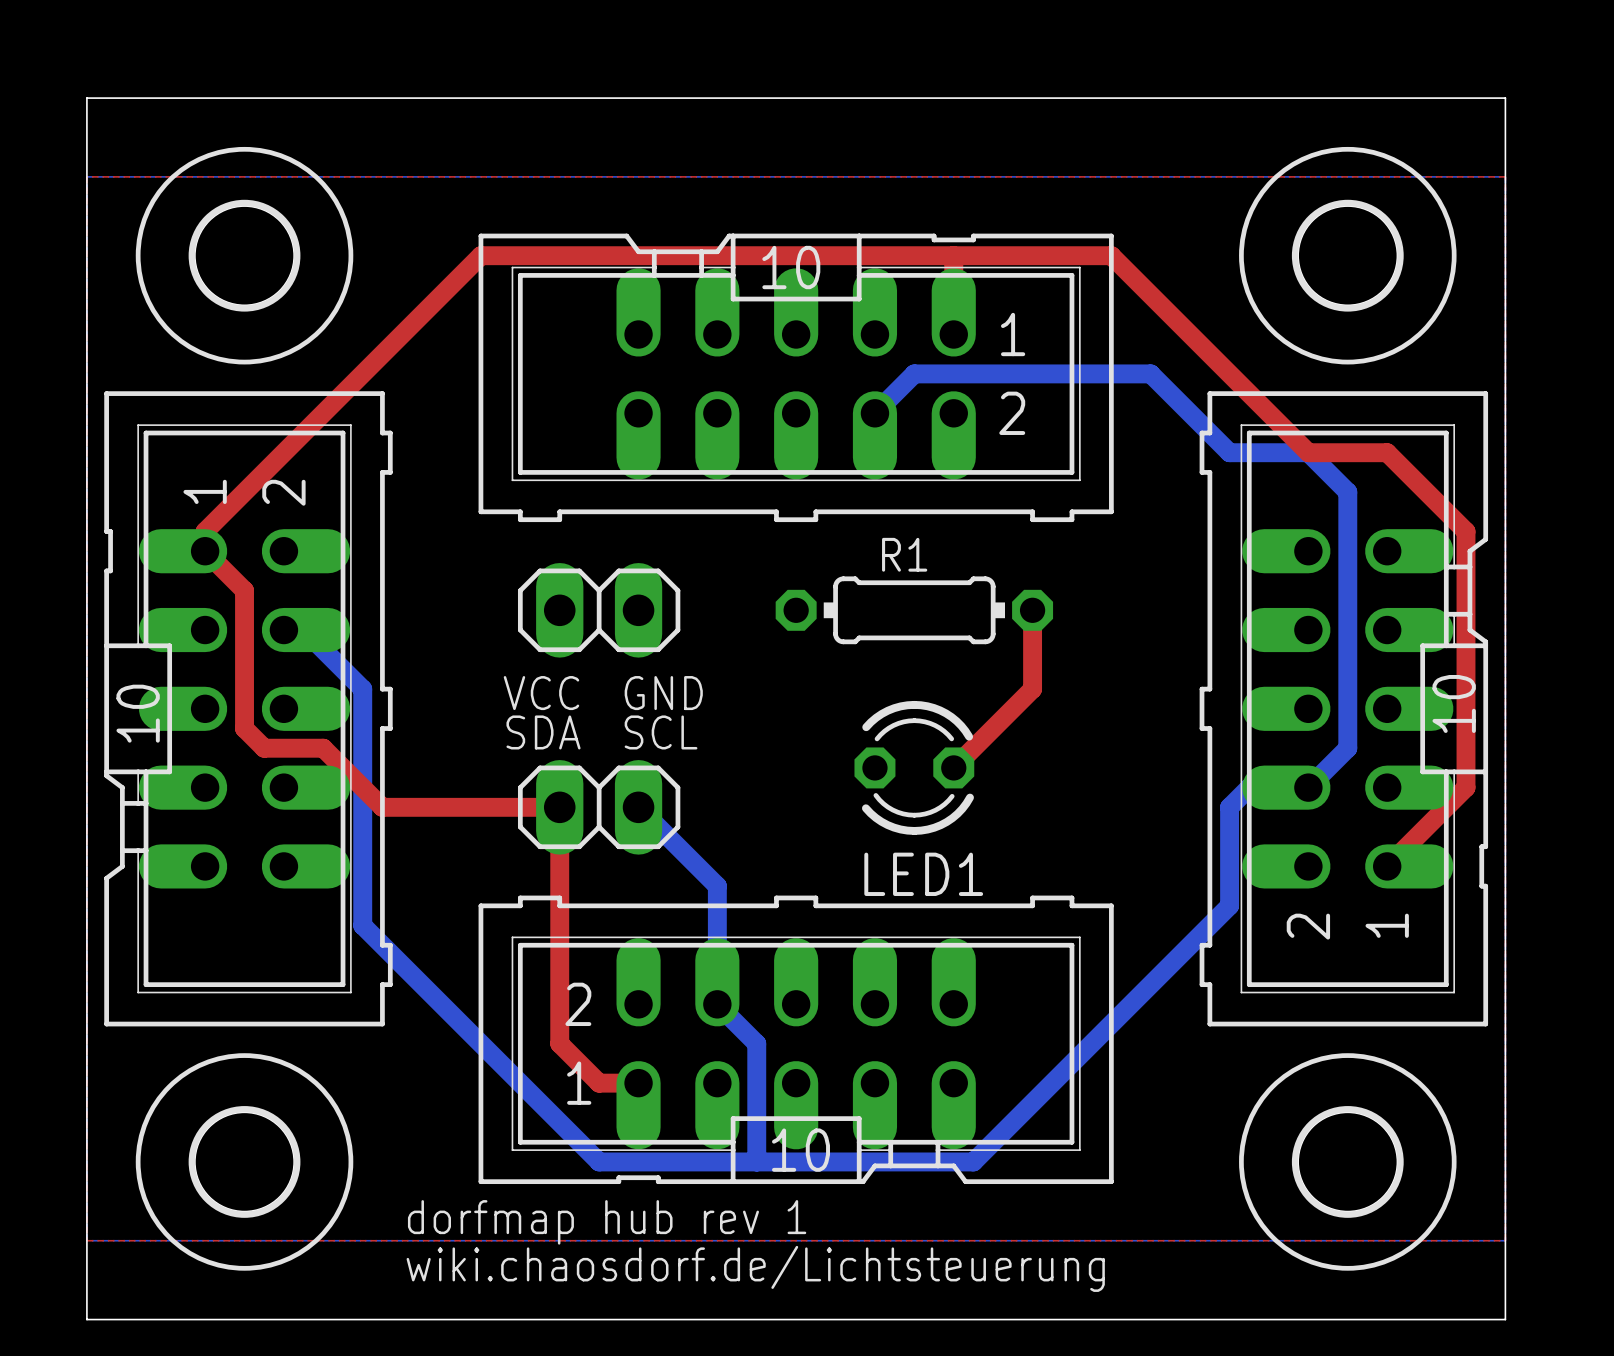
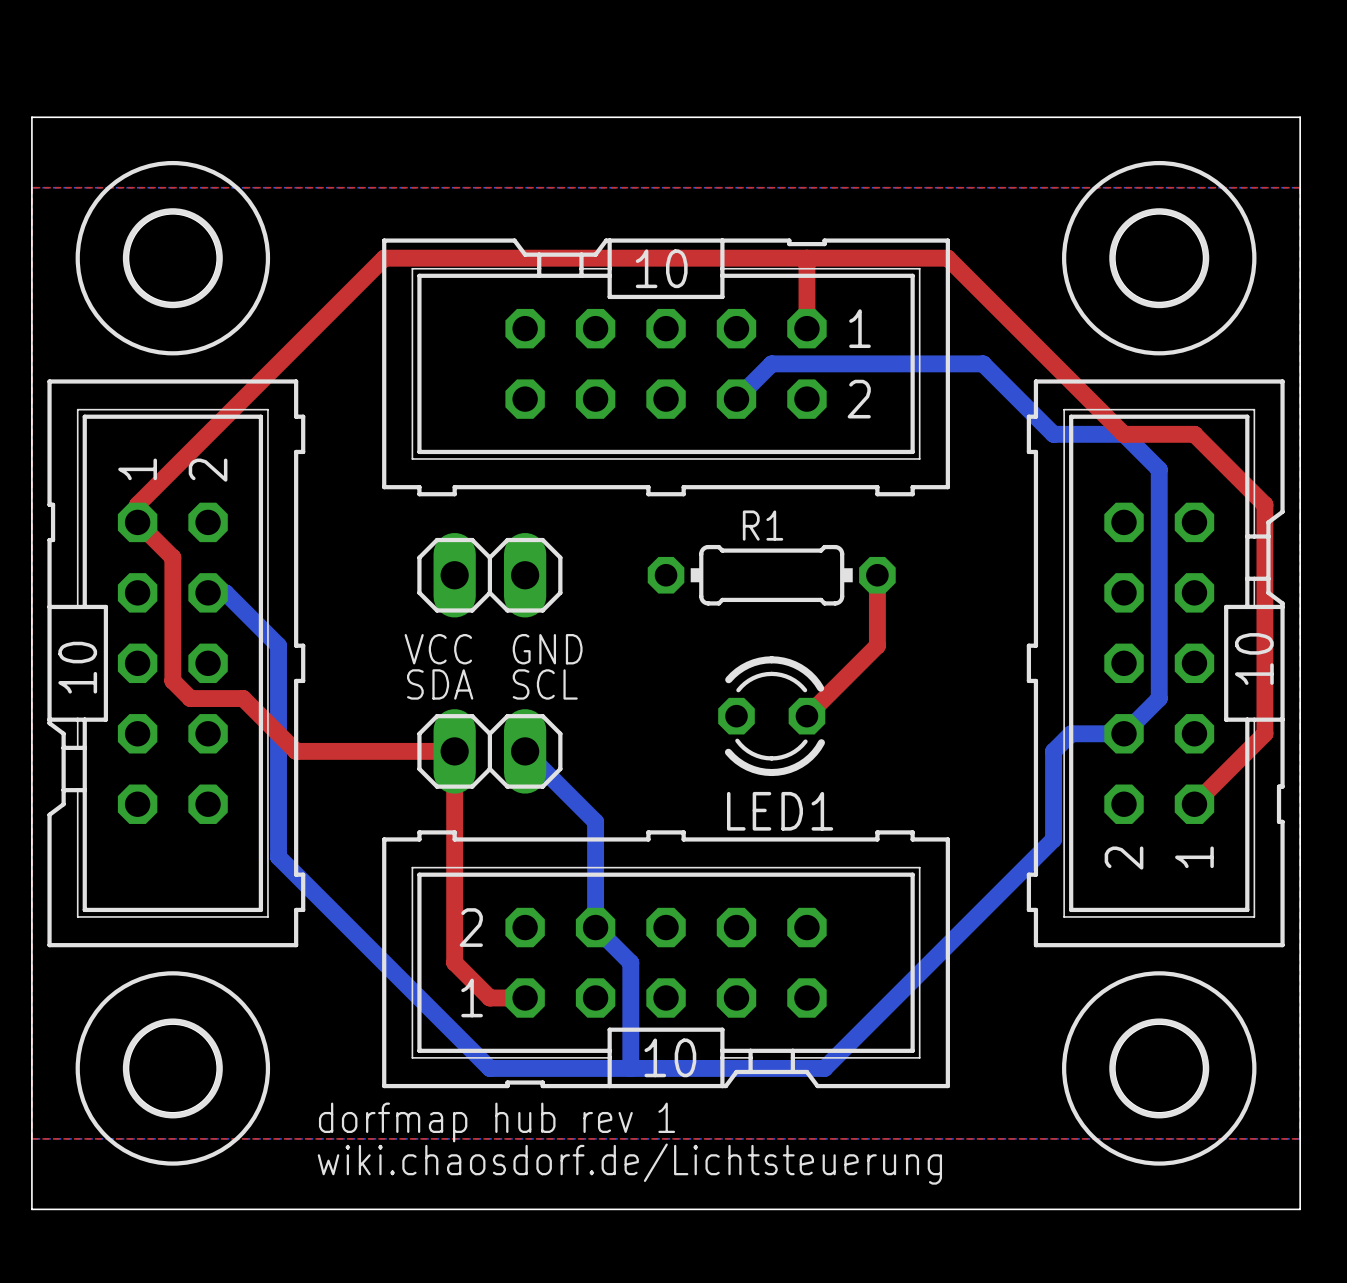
part footprint: [478, 233, 1114, 523] -> [382, 238, 950, 497]
part footprint: [104, 391, 393, 1027] -> [47, 379, 306, 948]
part footprint: [1199, 391, 1489, 1027] -> [1026, 379, 1285, 948]
part footprint: [478, 895, 1114, 1185] -> [382, 830, 950, 1089]

